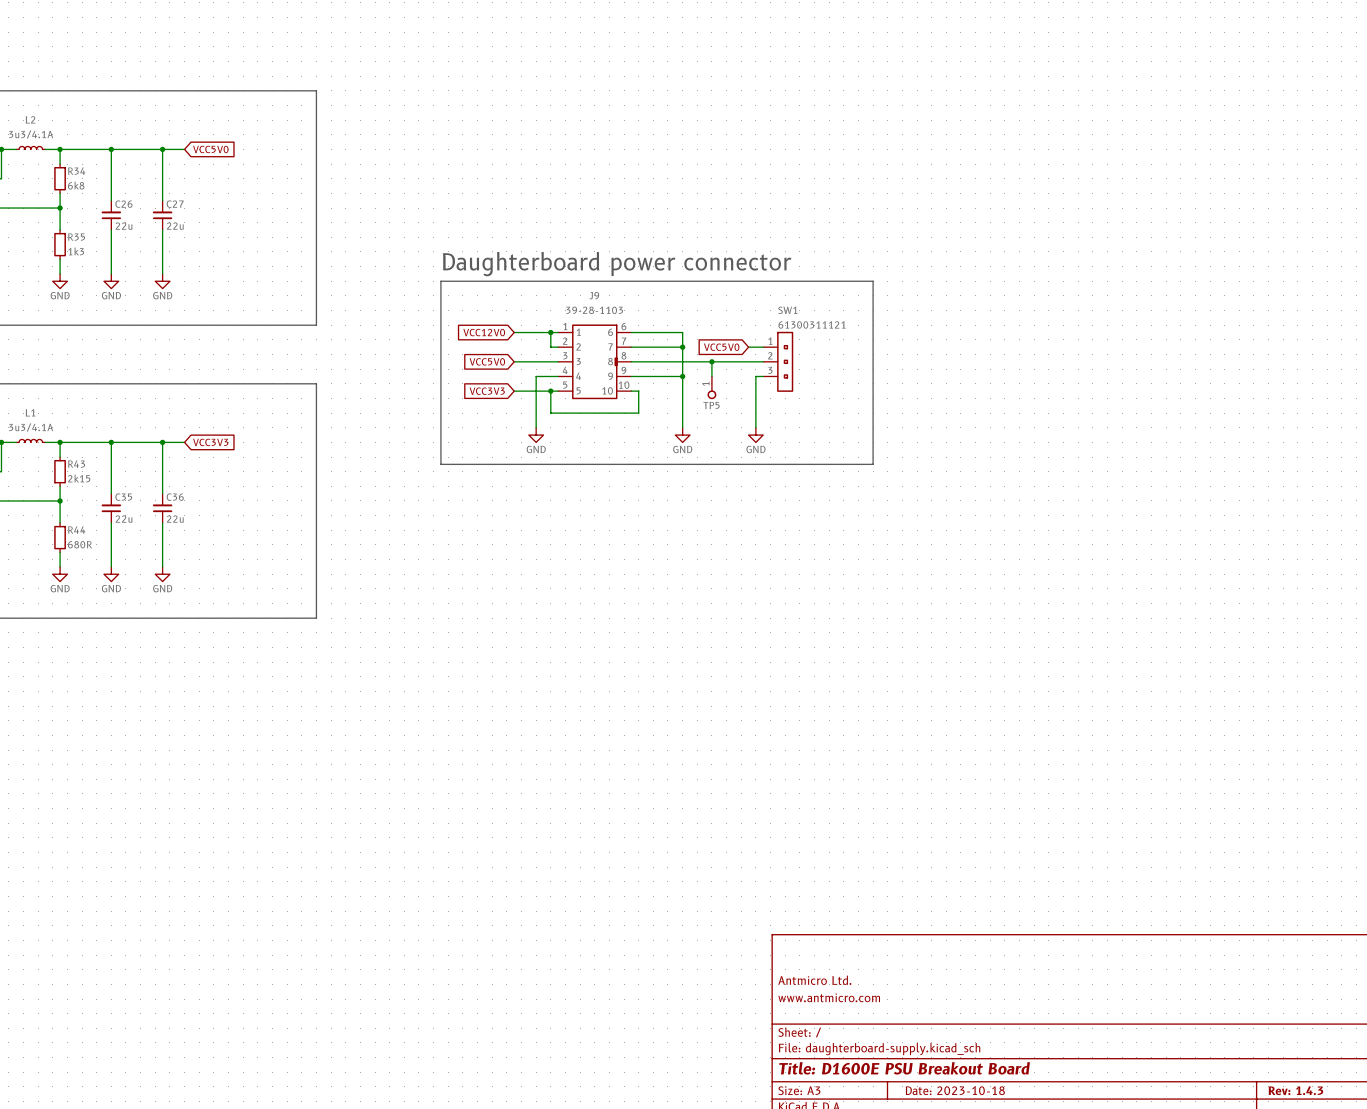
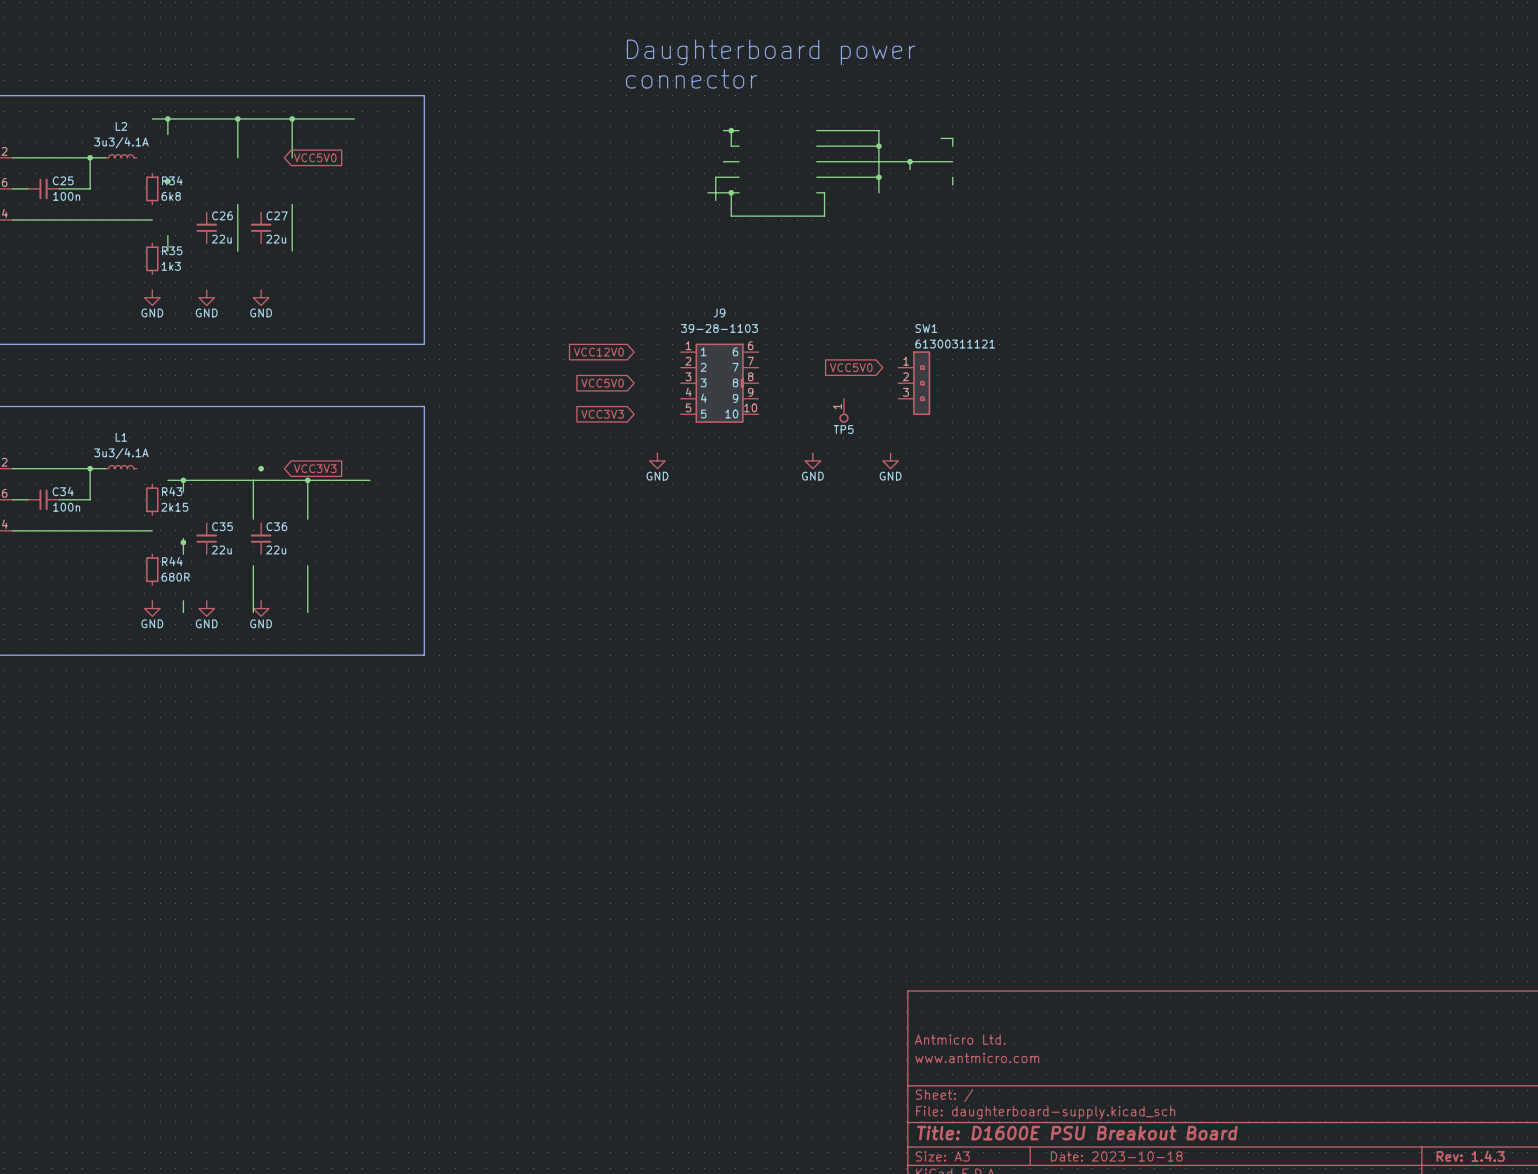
text: none -> Daughterboard power (771, 52)
text: none -> connector (691, 78)
wire: none -> (152, 118) (354, 118)
junction: none -> (167, 118)
junction: none -> (237, 118)
wire: none -> (292, 118) (292, 157)
junction: none -> (292, 118)
wire: none -> (723, 130) (739, 130)
wire: none -> (731, 130) (731, 146) (739, 146)
junction: none -> (731, 130)
wire: none -> (816, 130) (878, 130) (878, 192)
wire: none -> (941, 138) (952, 138) (952, 146)
wire: none -> (816, 146) (878, 146)
junction: none -> (878, 146)
wire: (45, 149) (184, 149) -> none
wire: (60, 149) (60, 164) -> (167, 118) (167, 134)
junction: (60, 149) -> none
wire: (111, 149) (111, 200) -> none
junction: (111, 149) -> none
wire: (162, 149) (162, 200) -> none
junction: (162, 149) -> none
wire: none -> (723, 161) (739, 161)
wire: none -> (816, 161) (952, 161)
wire: none -> (910, 161) (910, 169)
junction: none -> (910, 161)
wire: none -> (739, 177) (715, 177) (715, 200)
wire: none -> (816, 177) (878, 177)
junction: none -> (878, 177)
wire: none -> (952, 177) (952, 185)
junction: none -> (167, 181)
wire: none -> (707, 192) (739, 192)
wire: none -> (731, 192) (731, 216) (824, 216) (824, 192) (816, 192)
junction: none -> (731, 192)
wire: (60, 193) (60, 229) -> (237, 118) (237, 157)
junction: (60, 208) -> none
wire: (111, 229) (111, 273) -> (237, 204) (237, 251)
wire: (162, 229) (162, 273) -> (292, 204) (292, 251)
wire: (60, 259) (60, 273) -> (167, 235) (167, 251)
text: Daughterboard power connector (617, 264) -> none
line: (440, 281) (873, 281) (873, 464) (440, 464) (440, 281) -> none
wire: (514, 332) (558, 332) -> none
wire: (550, 332) (550, 347) (558, 347) -> none
junction: (550, 332) -> none
wire: (631, 332) (682, 332) (682, 427) -> none
wire: (631, 347) (682, 347) -> none
junction: (682, 347) -> none
wire: (748, 347) (763, 347) -> none
wire: (514, 361) (558, 361) -> none
wire: (631, 361) (763, 361) -> none
wire: (711, 361) (711, 376) -> none
junction: (711, 361) -> none
wire: (558, 376) (536, 376) (536, 427) -> none
wire: (631, 376) (682, 376) -> none
junction: (682, 376) -> none
wire: (763, 376) (755, 376) (755, 427) -> none
wire: (514, 391) (558, 391) -> none
wire: (550, 391) (550, 413) (638, 413) (638, 391) (631, 391) -> none
junction: (550, 391) -> none
wire: (45, 442) (184, 442) -> none
wire: (60, 442) (60, 457) -> none
junction: (60, 442) -> none
wire: (111, 442) (111, 493) -> none
junction: (111, 442) -> none
wire: (162, 442) (162, 493) -> none
wire: none -> (167, 480) (369, 480)
wire: none -> (183, 480) (183, 491)
junction: none -> (183, 480)
wire: none -> (307, 480) (307, 519)
junction: none -> (307, 480)
wire: (60, 486) (60, 522) -> (253, 480) (253, 519)
junction: (60, 500) -> none
junction: none -> (183, 542)
wire: (111, 522) (111, 566) -> (253, 565) (253, 612)
wire: (162, 522) (162, 566) -> (307, 565) (307, 612)
wire: (60, 552) (60, 566) -> (183, 538) (183, 554)
wire: none -> (183, 600) (183, 612)

